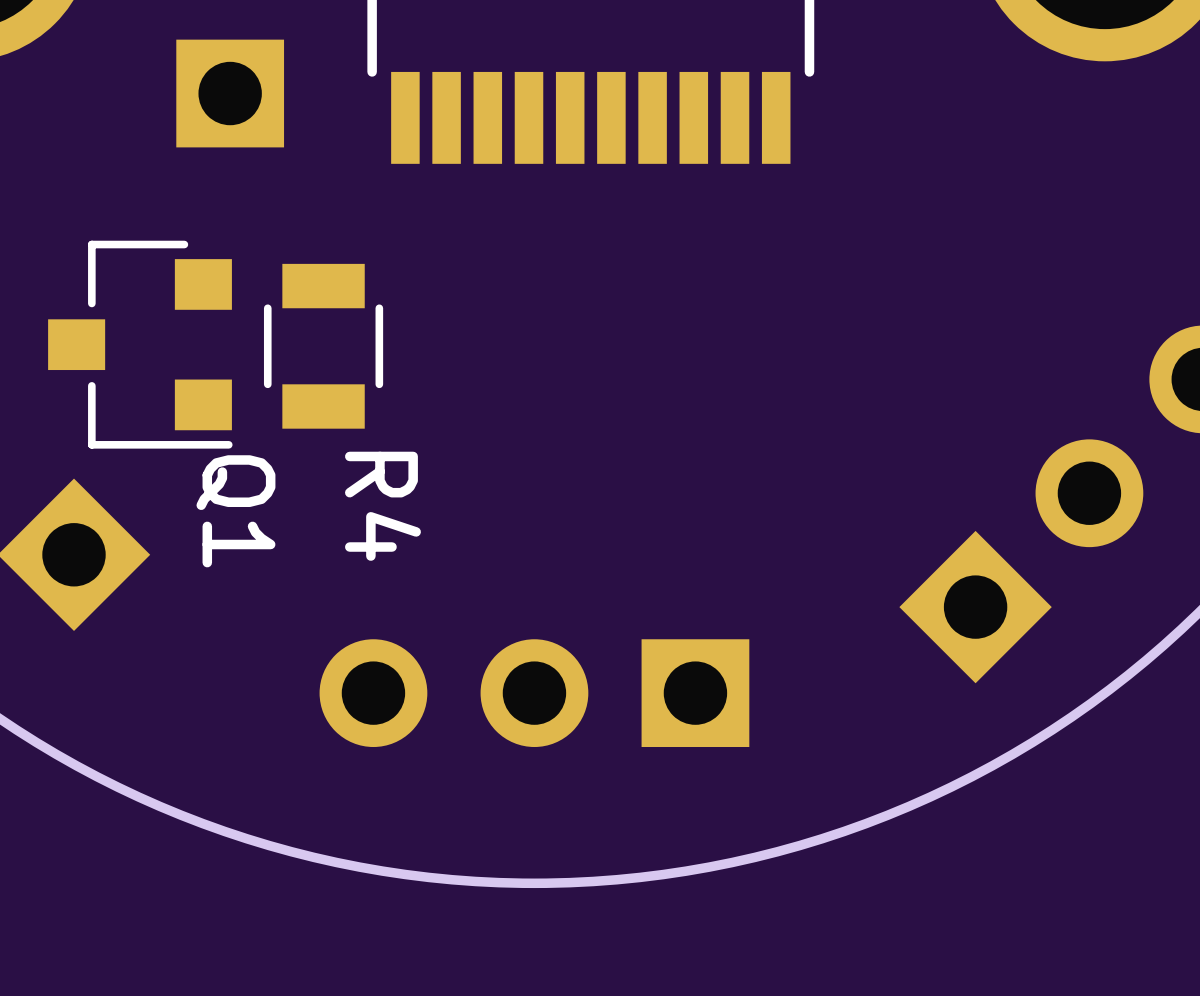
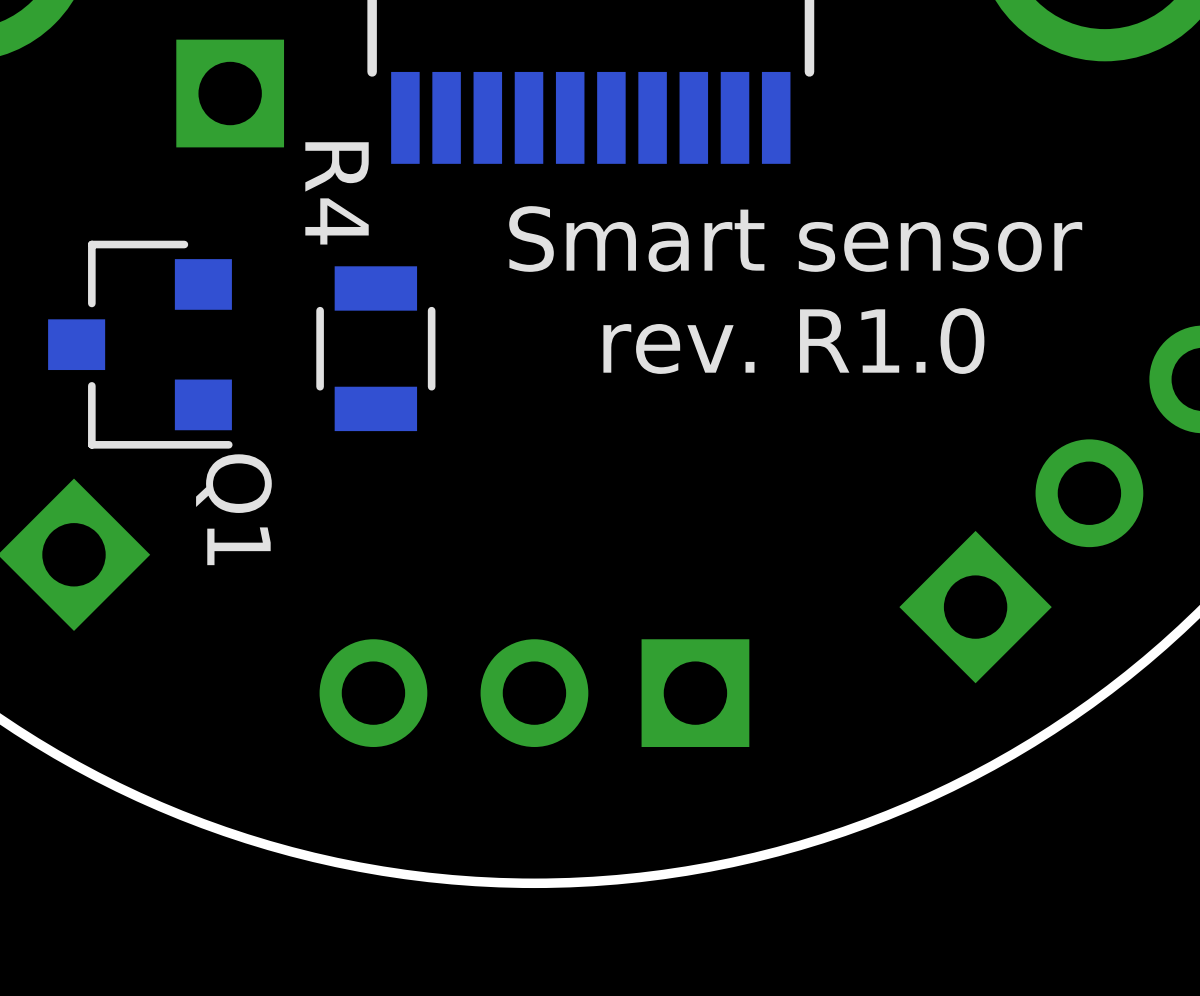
text: none -> Smart sensor (795, 239)
text: none -> rev. R1.0 (793, 341)
R4 position: (323, 346) -> (375, 348)
R4 name position: R4 (382, 506) -> R4 (337, 193)

